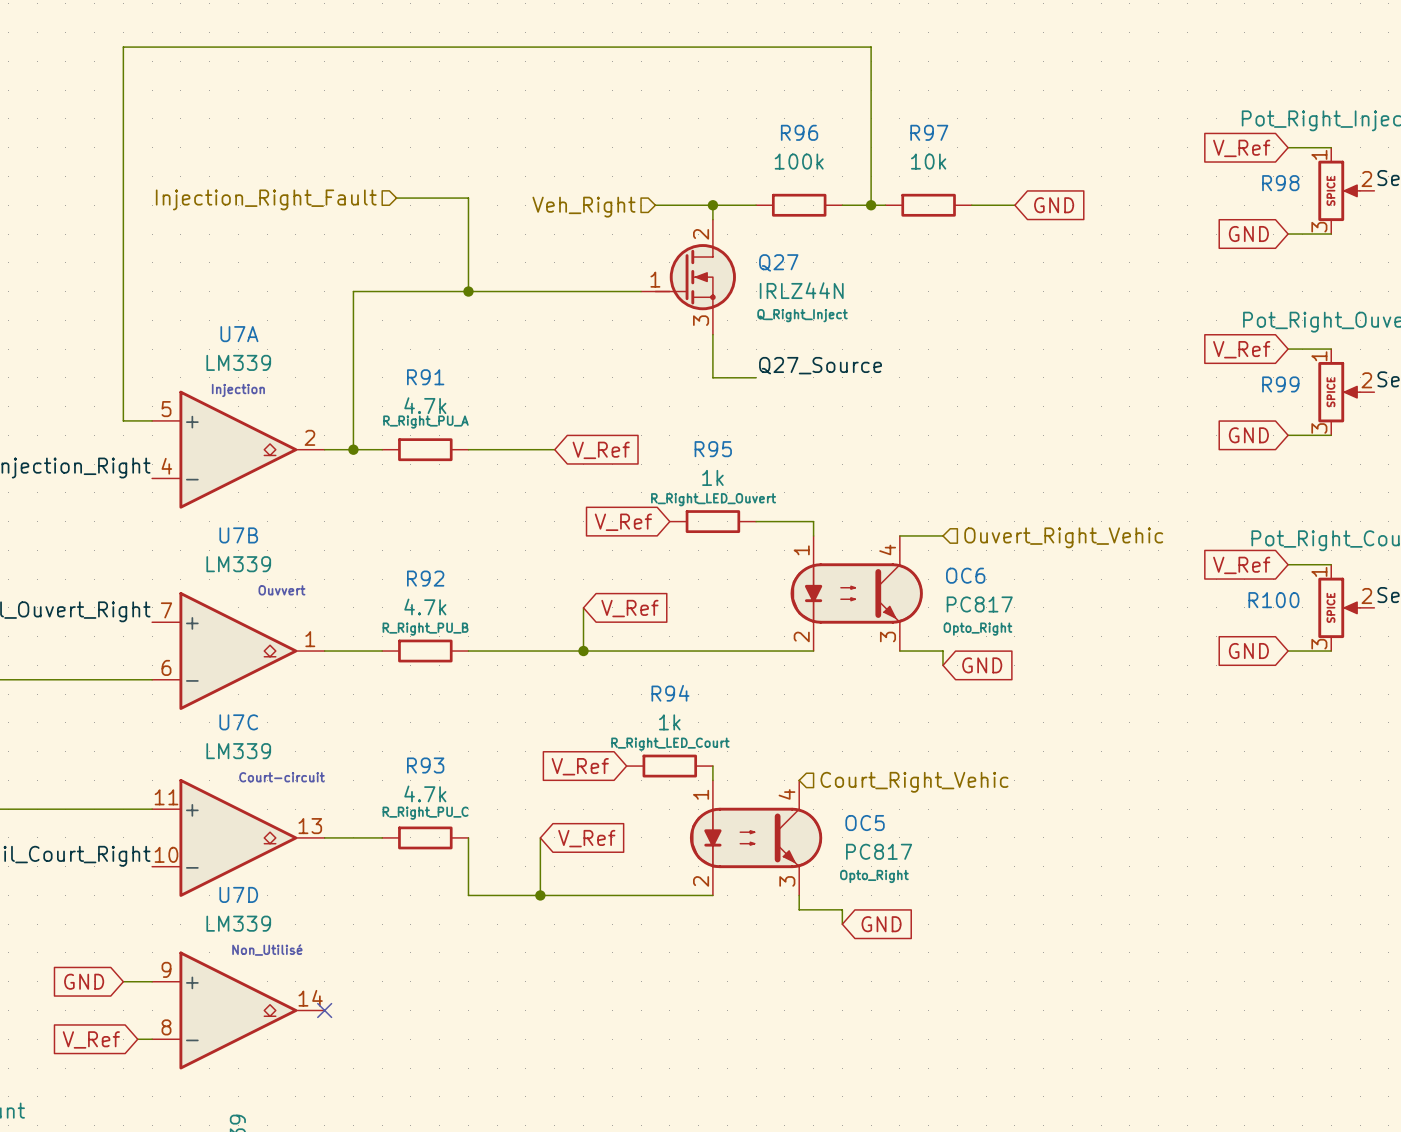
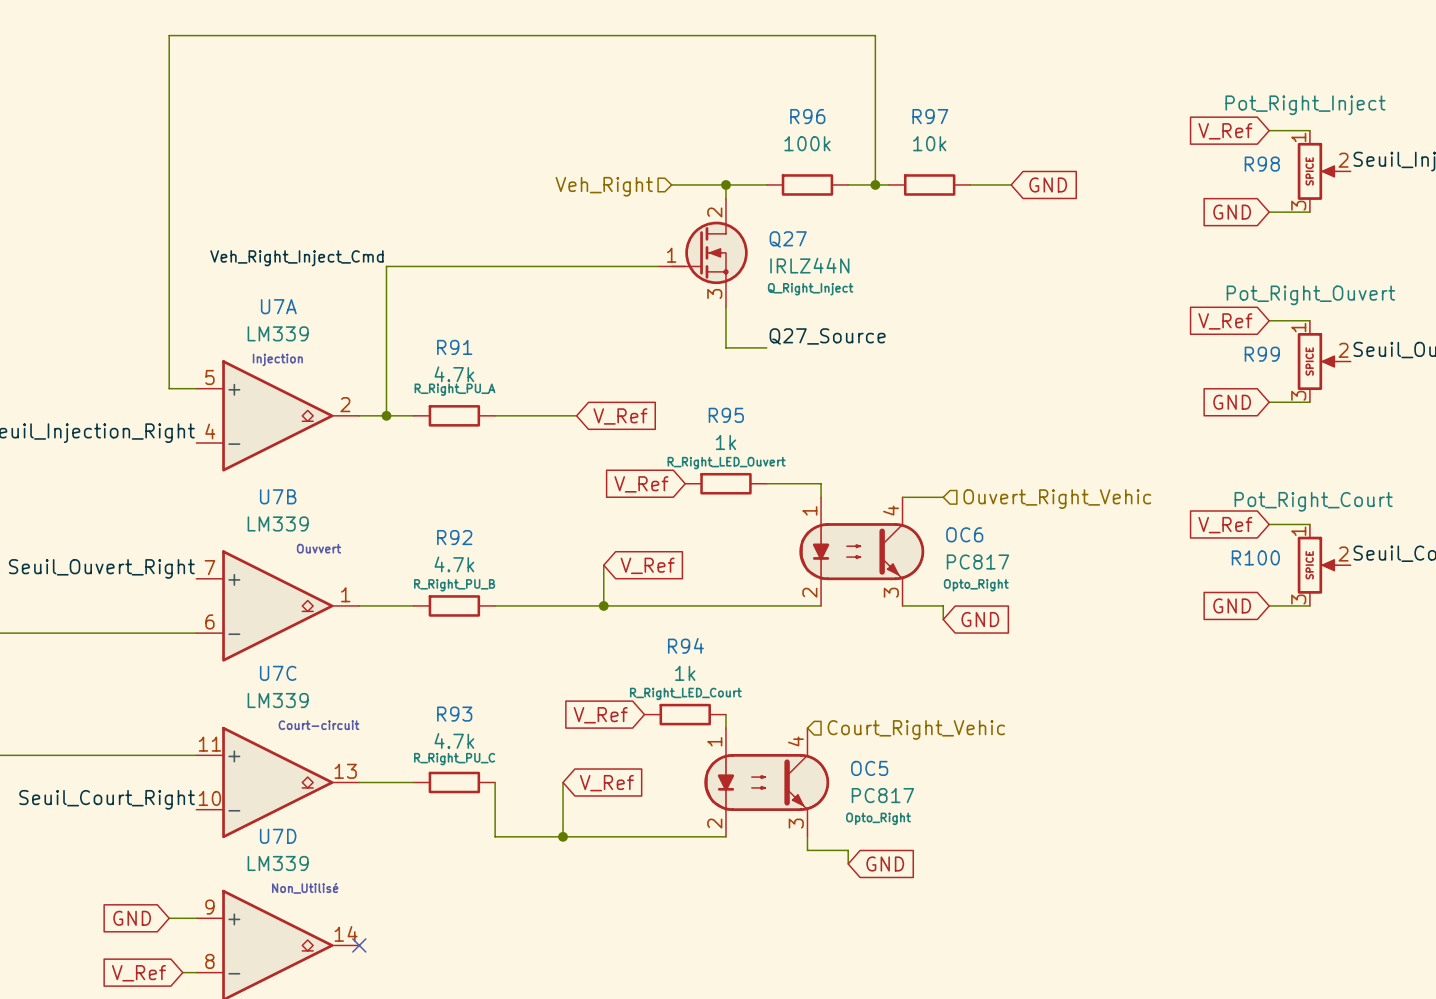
wire: (396, 198) (468, 198) (468, 291) -> none
hierarchical label: Injection_Right_Fault (266, 199) -> none
label: none -> Veh_Right_Inject_Cmd (296, 258)
junction: (468, 291) -> none

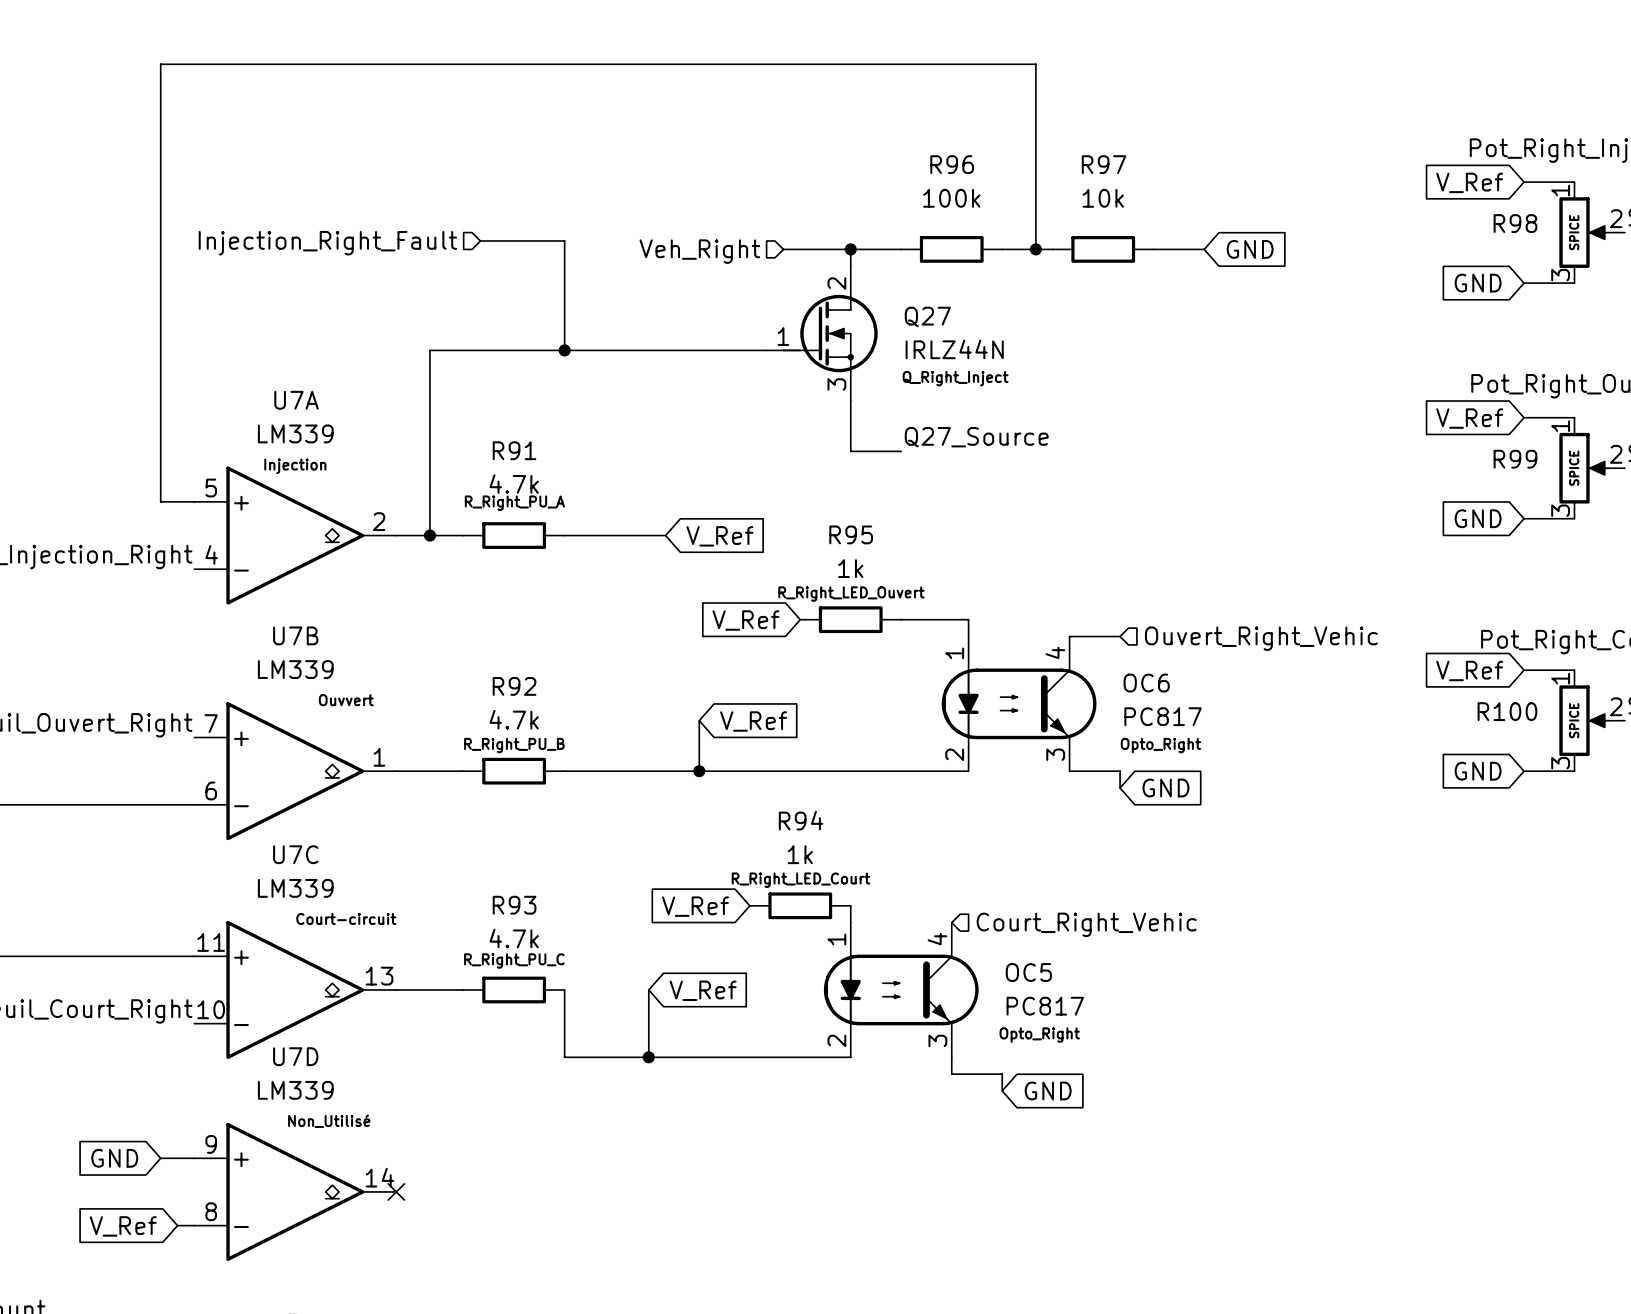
wire: none -> (480, 241) (564, 241) (564, 350)
hierarchical label: none -> Injection_Right_Fault (327, 243)
label: Veh_Right_Inject_Cmd (296, 258) -> none
junction: none -> (564, 350)

